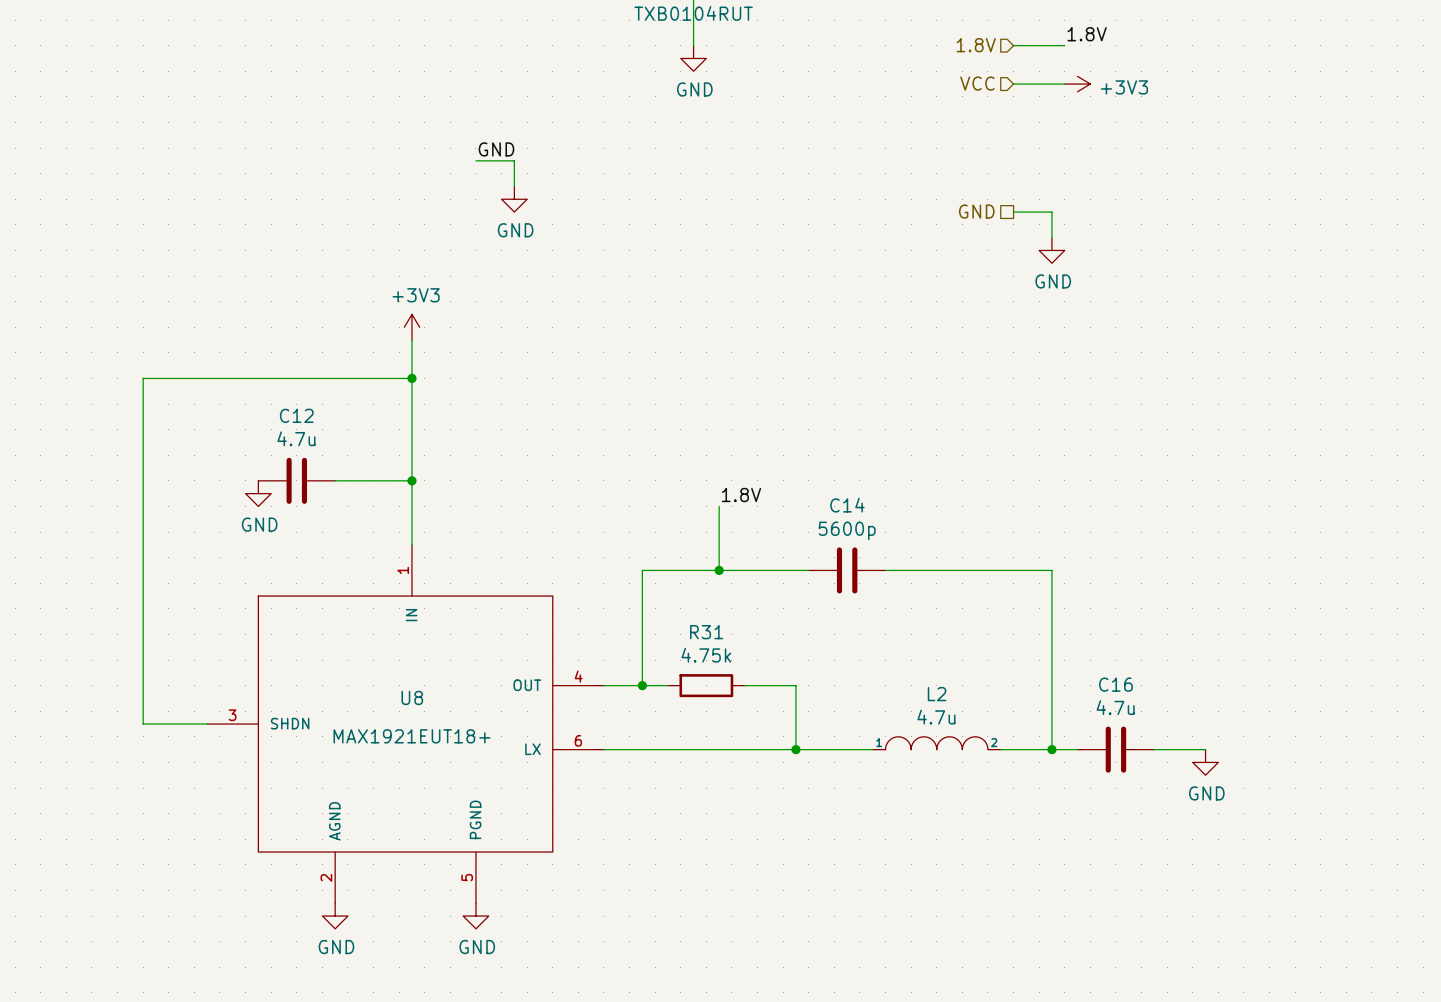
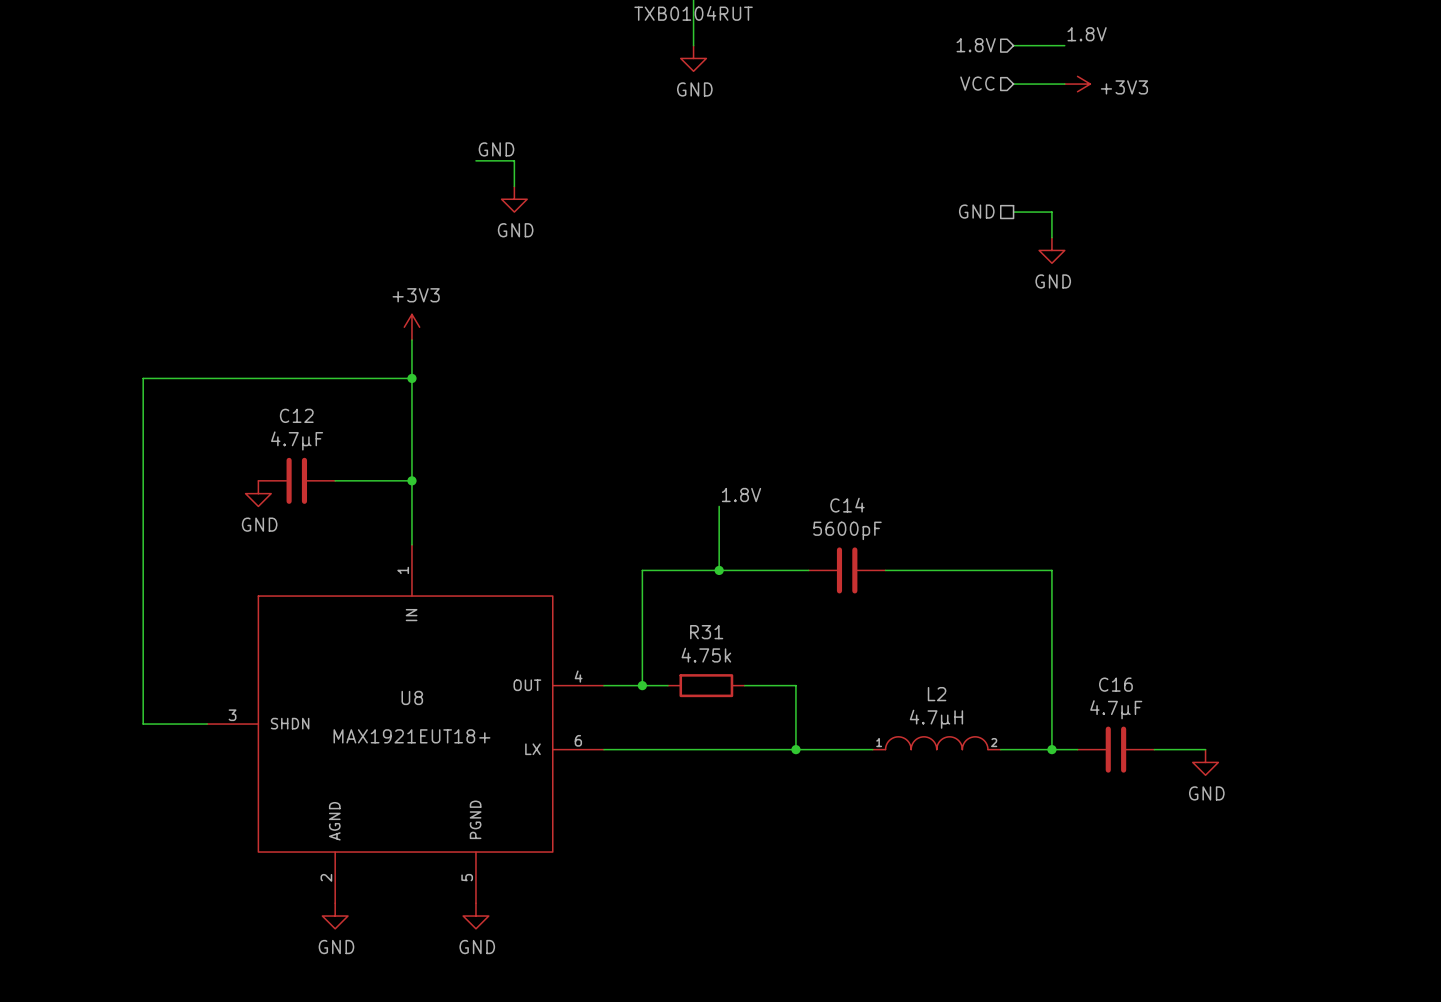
C12 value: 4.7u (296, 438) -> 4.7µF (297, 440)
C14 value: 5600p (847, 530) -> 5600pF (847, 530)
C16 value: 4.7u (1115, 707) -> 4.7µF (1116, 709)
L2 value: 4.7u (936, 717) -> 4.7µH (936, 719)

